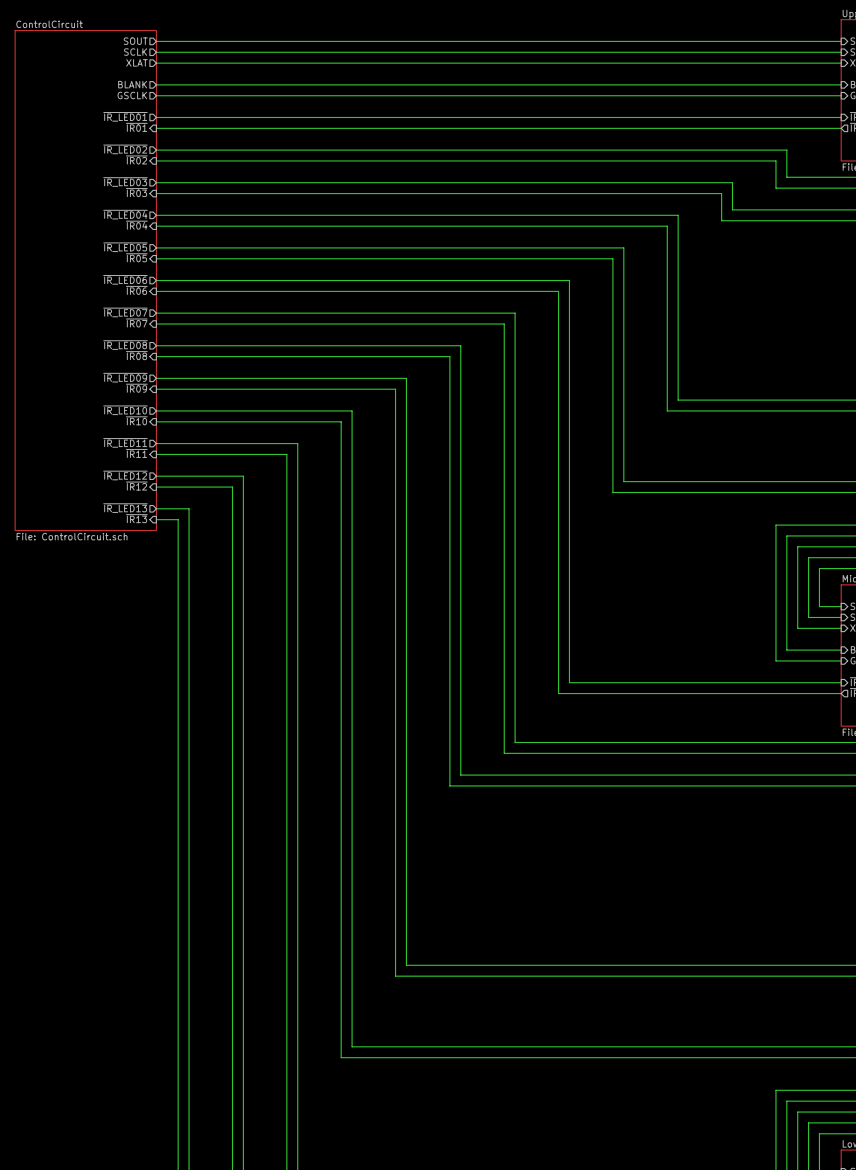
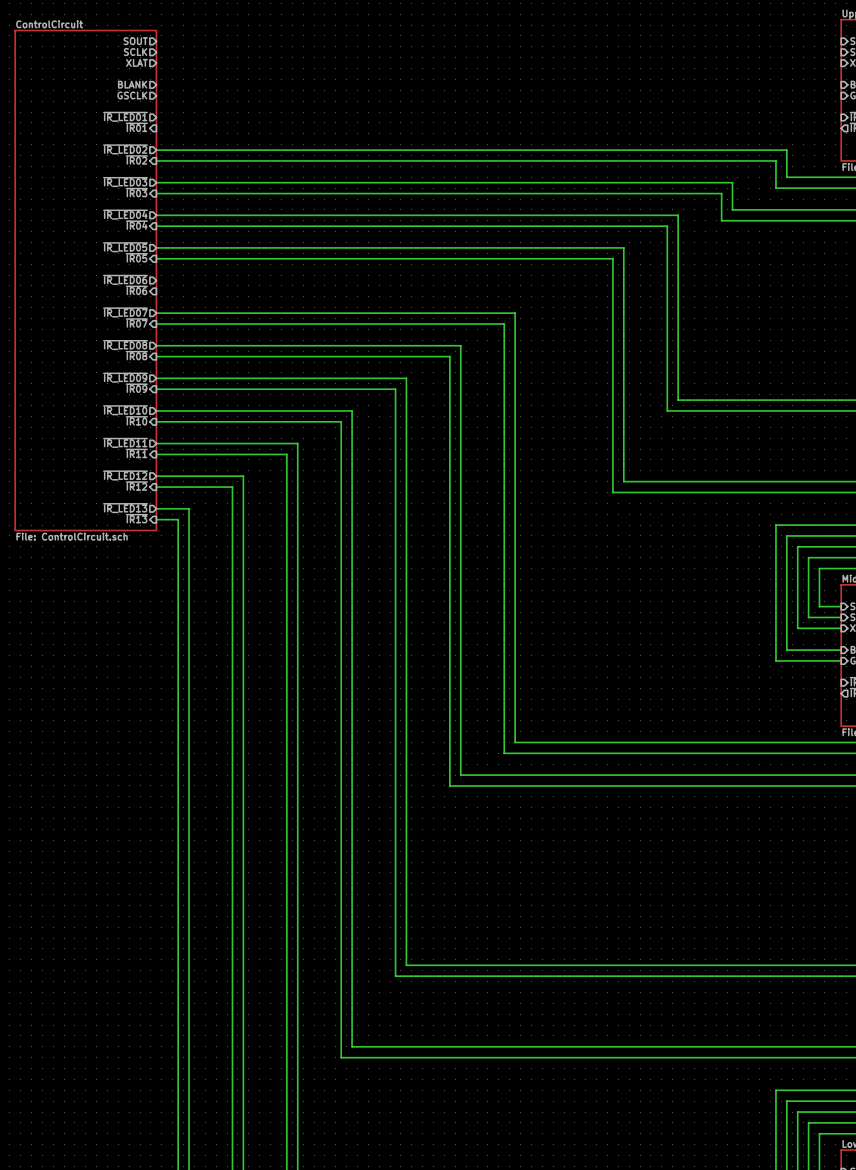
wire: (156, 41) (841, 41) -> none
wire: (156, 52) (841, 52) -> none
wire: (156, 63) (841, 63) -> none
wire: (156, 84) (841, 84) -> none
wire: (156, 95) (841, 95) -> none
wire: (156, 117) (841, 117) -> none
wire: (156, 128) (841, 128) -> none
wire: (156, 280) (569, 280) (569, 682) (841, 682) -> none
wire: (156, 291) (558, 291) (558, 693) (841, 693) -> none

